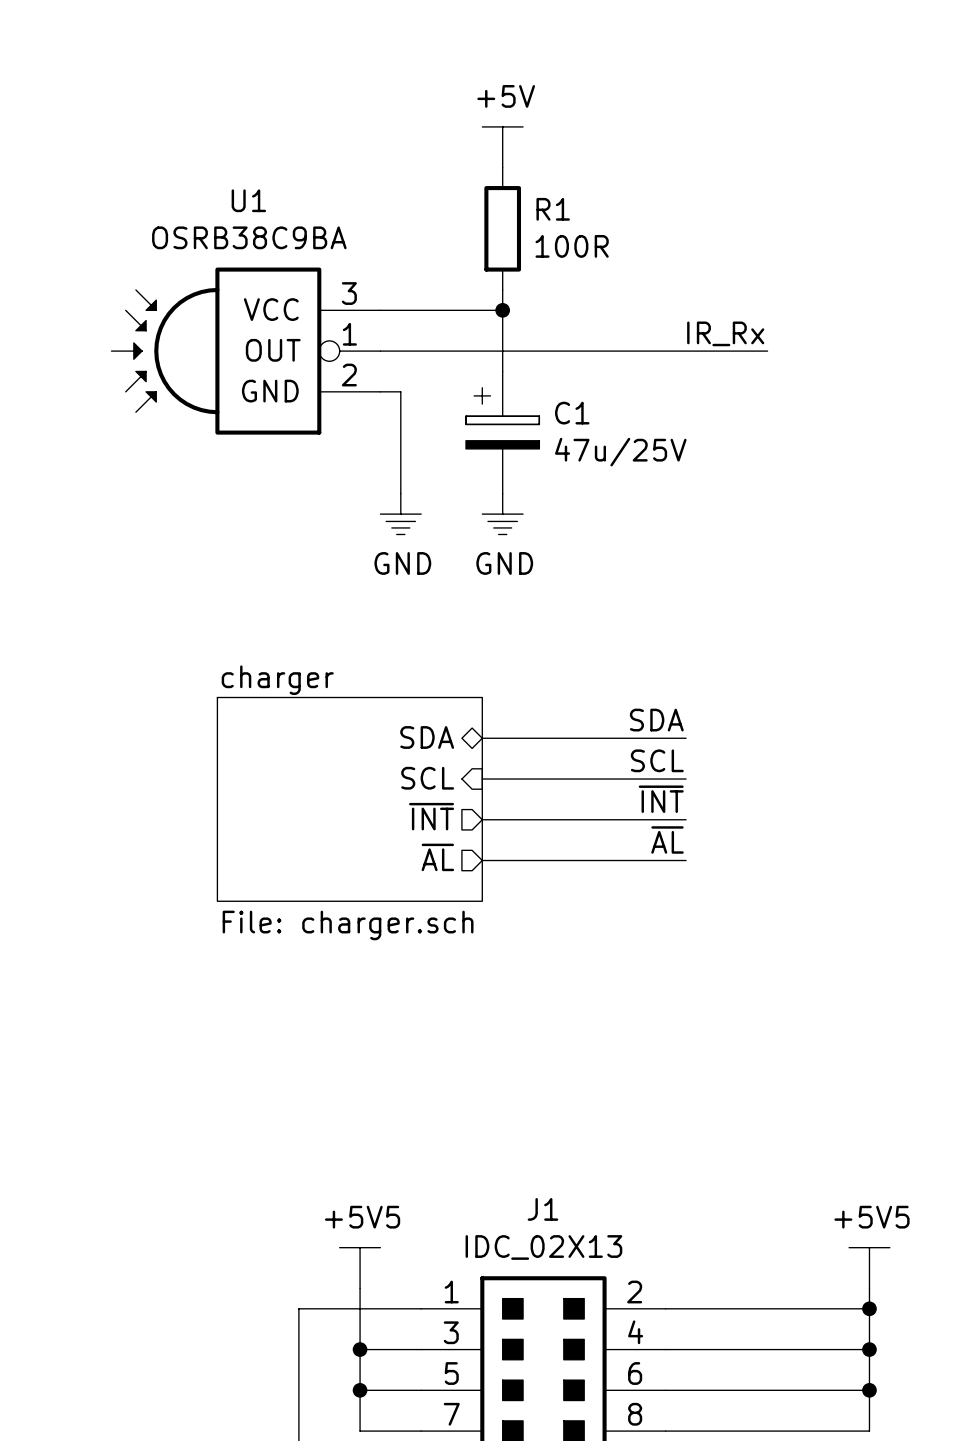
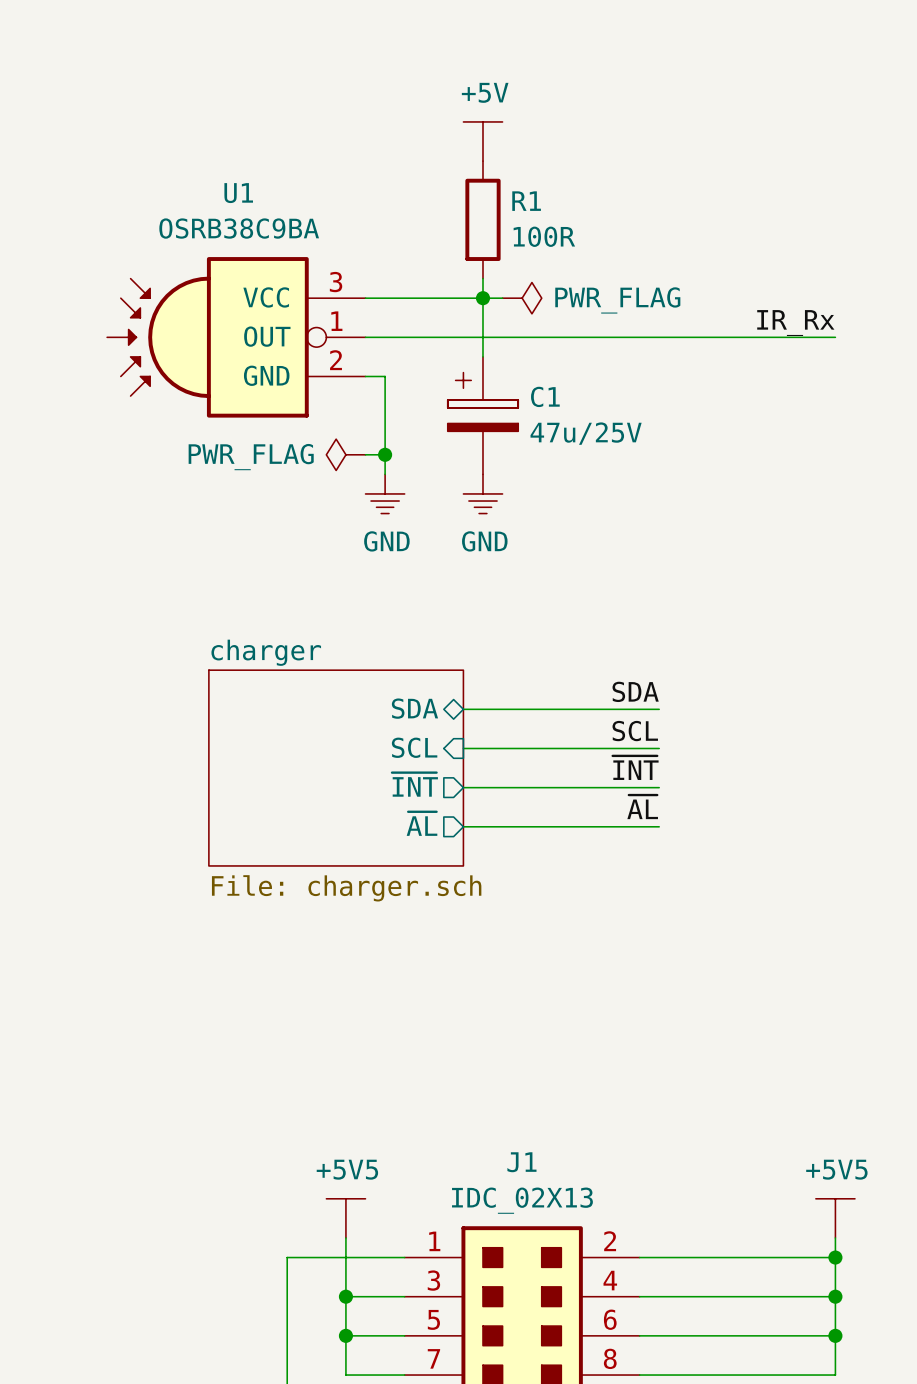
wire: none -> (482, 298) (502, 298)
power symbol: none -> PWR_FLAG (522, 298)
label position: IR_Rx (725, 333) -> IR_Rx (795, 323)
wire: none -> (737, 337) (835, 337)
power symbol: none -> PWR_FLAG (345, 454)
wire: none -> (365, 454) (385, 454)
junction: none -> (385, 454)

